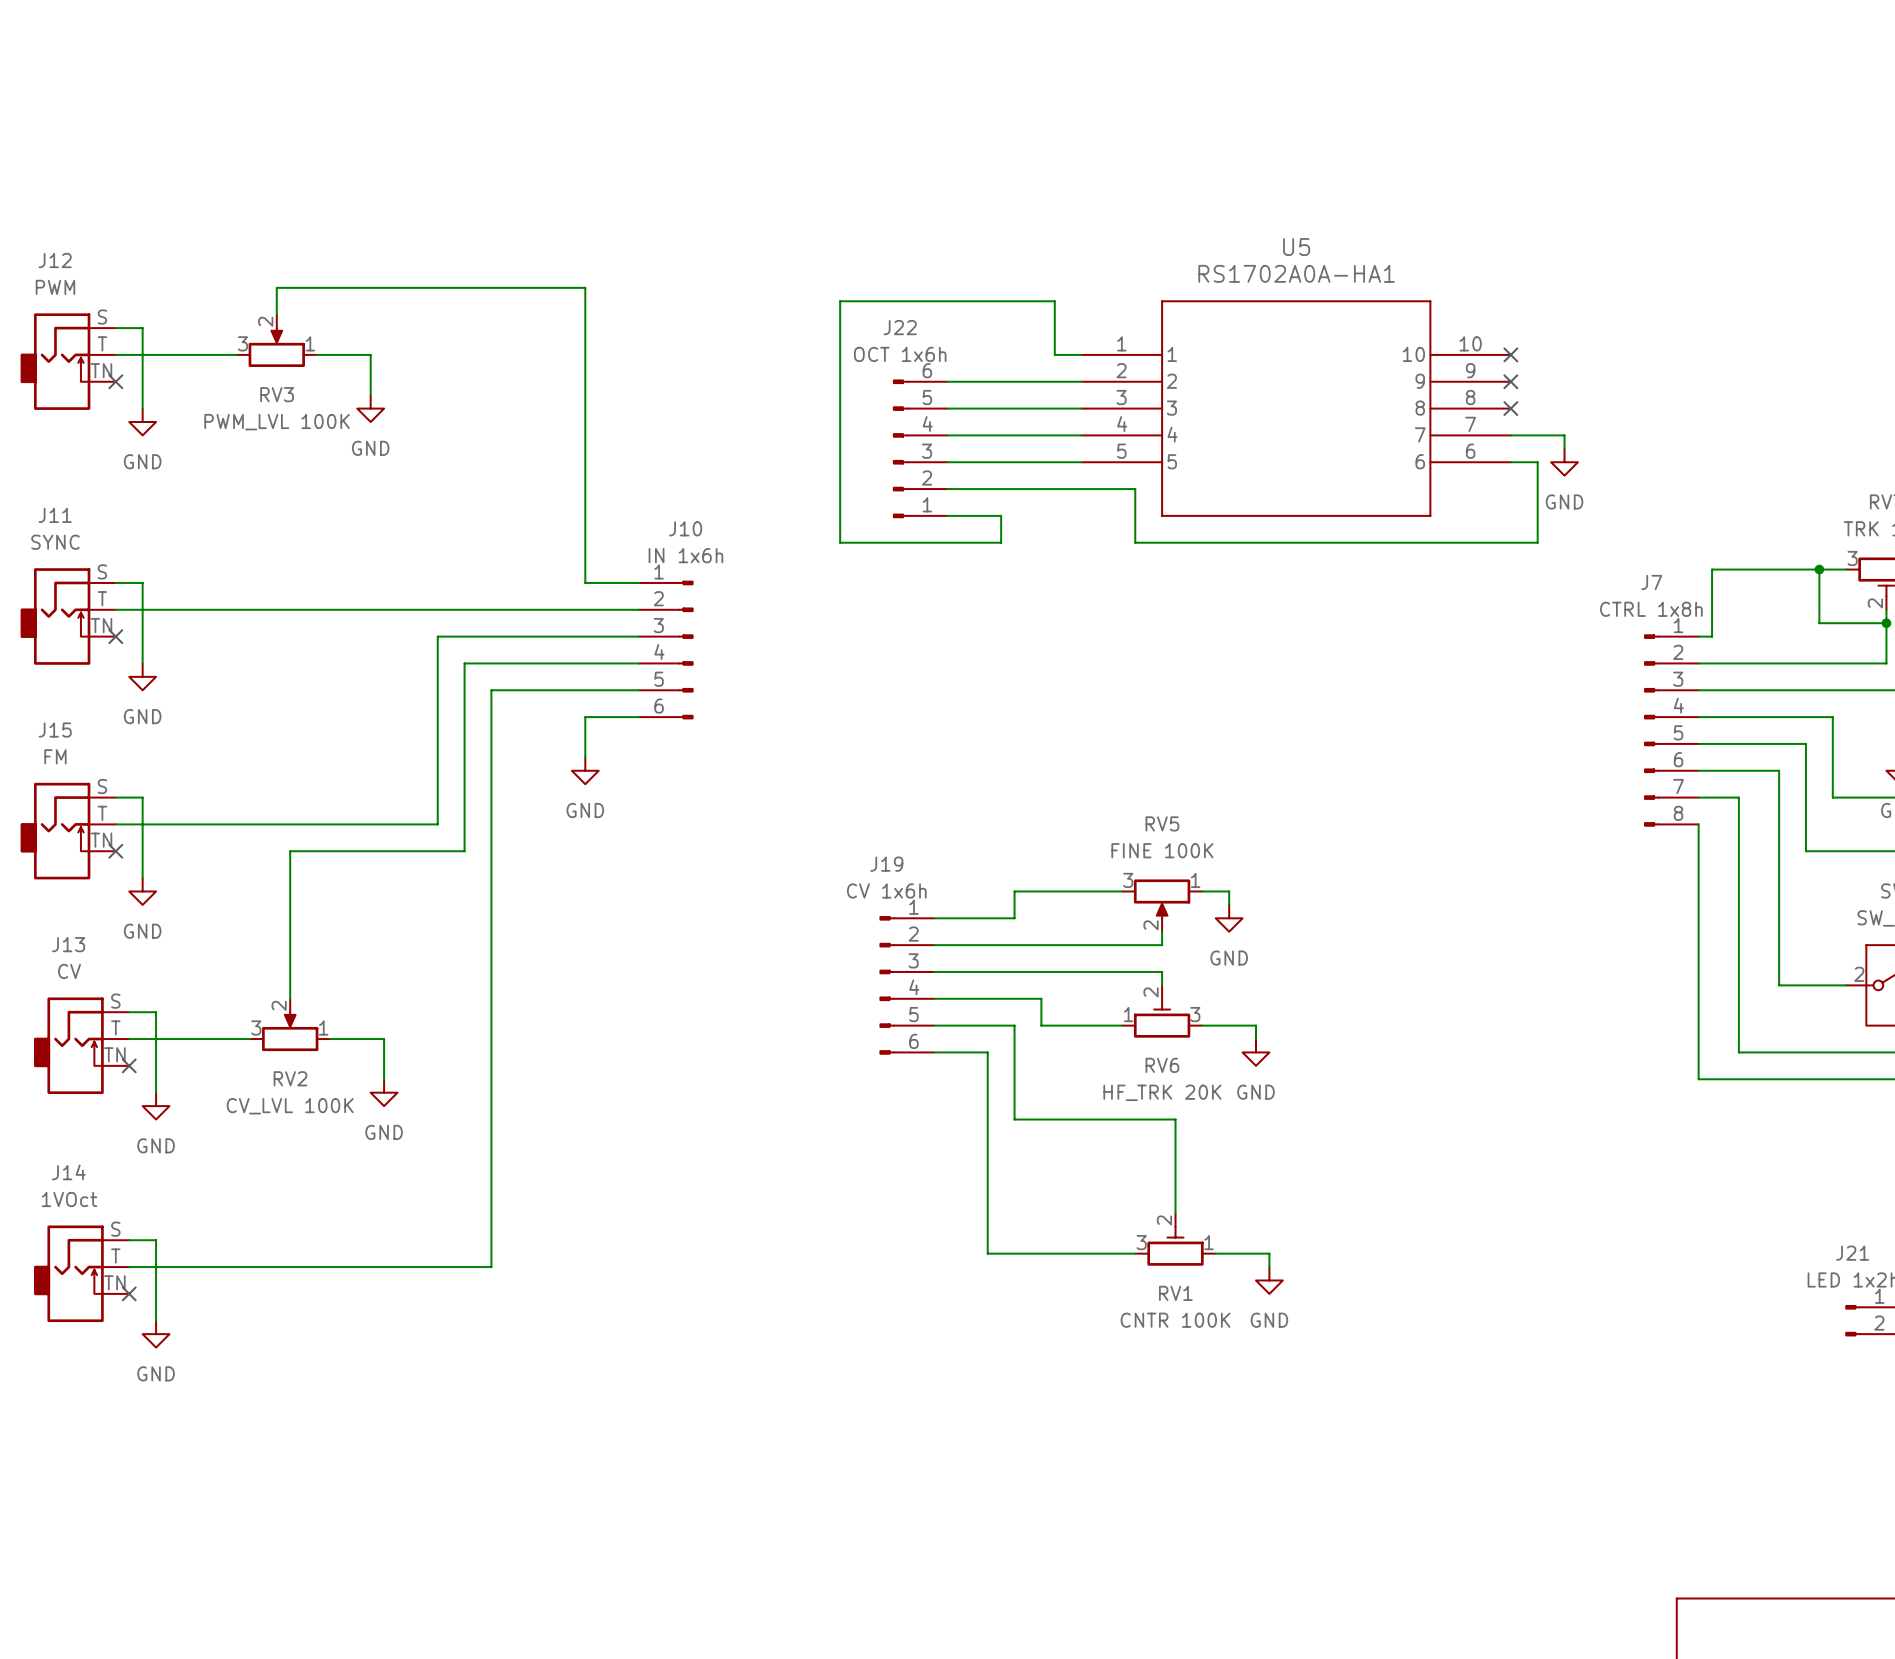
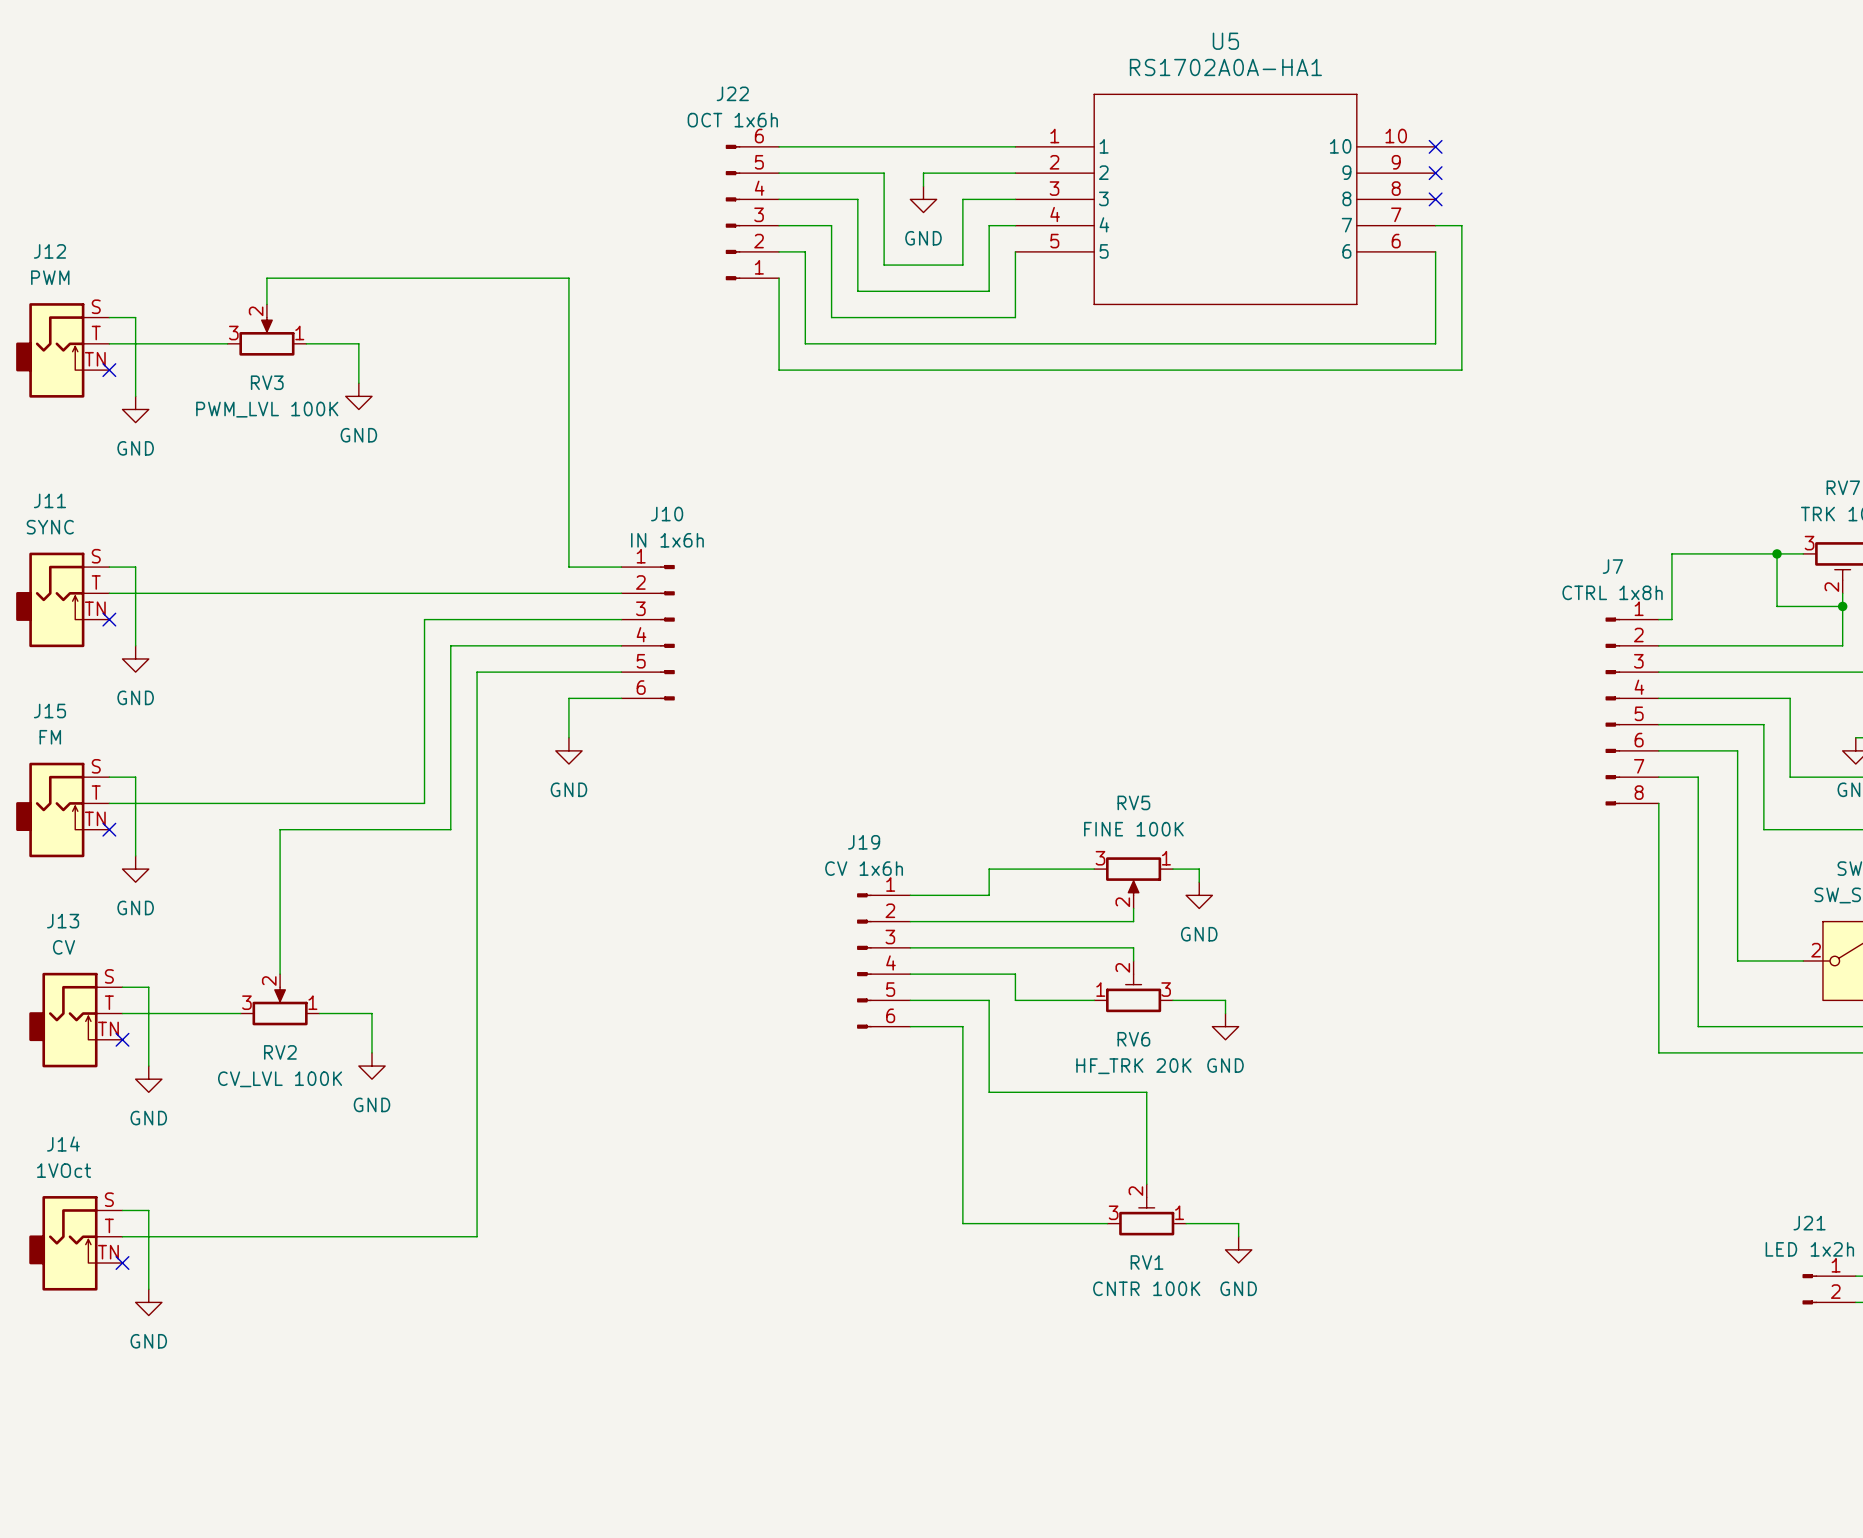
wire: none -> (779, 146) (1015, 146)
no-connect mark: none -> (1435, 146)
wire: none -> (779, 173) (884, 173) (884, 265) (962, 265) (962, 199) (1015, 199)
wire: none -> (1015, 173) (923, 173) (923, 186)
no-connect mark: none -> (1435, 173)
power symbol: none -> GND (923, 199)
no-connect mark: none -> (1435, 199)
wire: none -> (779, 225) (831, 225) (831, 317) (1015, 317) (1015, 251)
wire: none -> (1435, 225) (1461, 225) (1461, 370) (1054, 370)
wire: none -> (779, 251) (805, 251) (805, 343) (1028, 343)
wire: none -> (1435, 251) (1435, 343) (1054, 343)
wire: none -> (779, 278) (779, 370) (923, 370)
wire: (880, 301) (840, 301) (840, 542) (1001, 542) (1001, 515) (947, 515) -> (857, 291) (857, 199) (779, 199)
wire: (1014, 301) (1054, 301) (1054, 354) -> (989, 291) (989, 225) (1015, 225)
no-connect mark: (1510, 354) -> none
no-connect mark: (1510, 381) -> none
wire: (947, 408) (1081, 408) -> none
U5 position: (1296, 408) -> (1225, 199)
no-connect mark: (1510, 408) -> none
wire: (947, 435) (1081, 435) -> none
wire: (1510, 435) (1564, 435) (1564, 448) -> none
J22 position: (920, 448) -> (752, 212)
wire: (947, 462) (1081, 462) -> none
wire: (1510, 462) (1537, 462) (1537, 542) (1135, 542) (1135, 489) (947, 489) -> none
power symbol: GND (1564, 462) -> none

